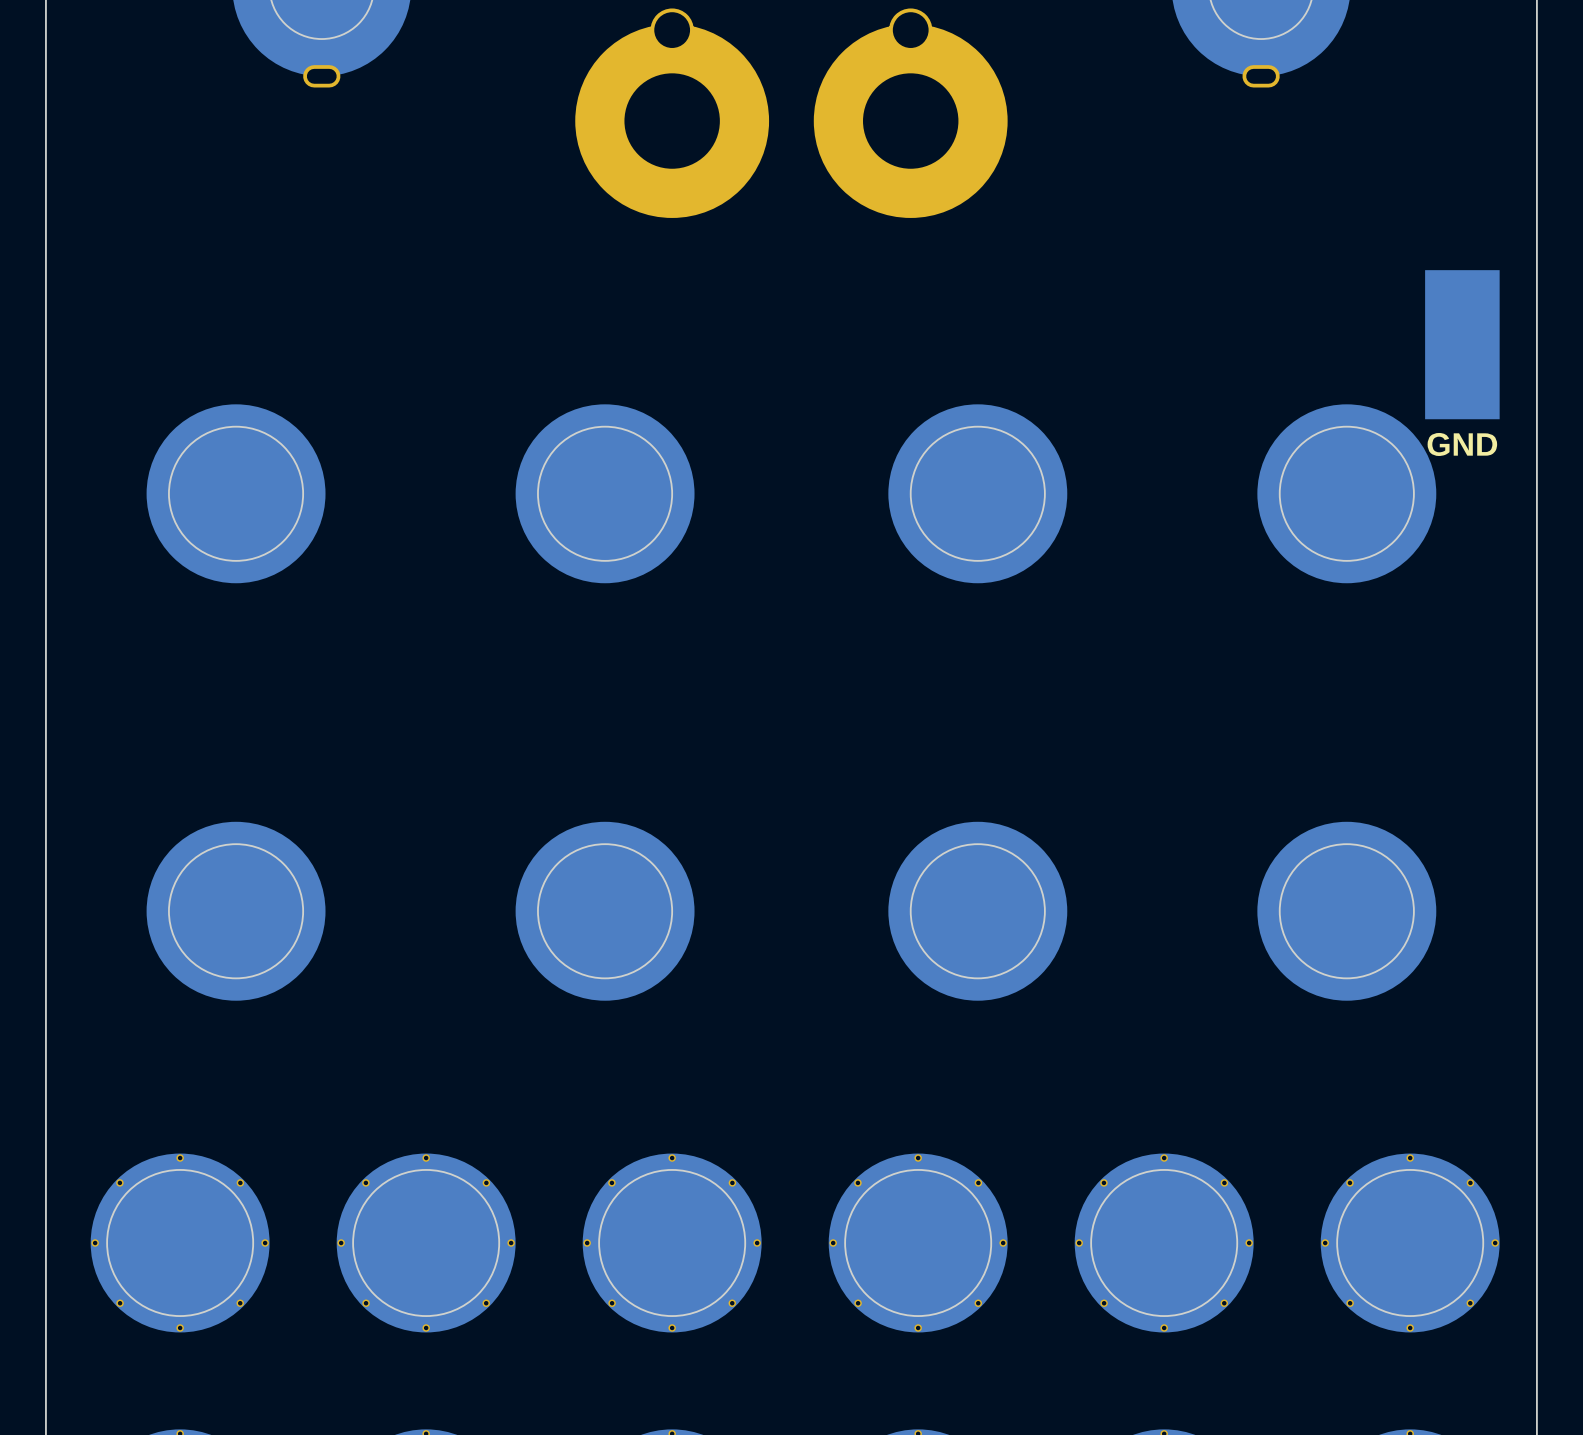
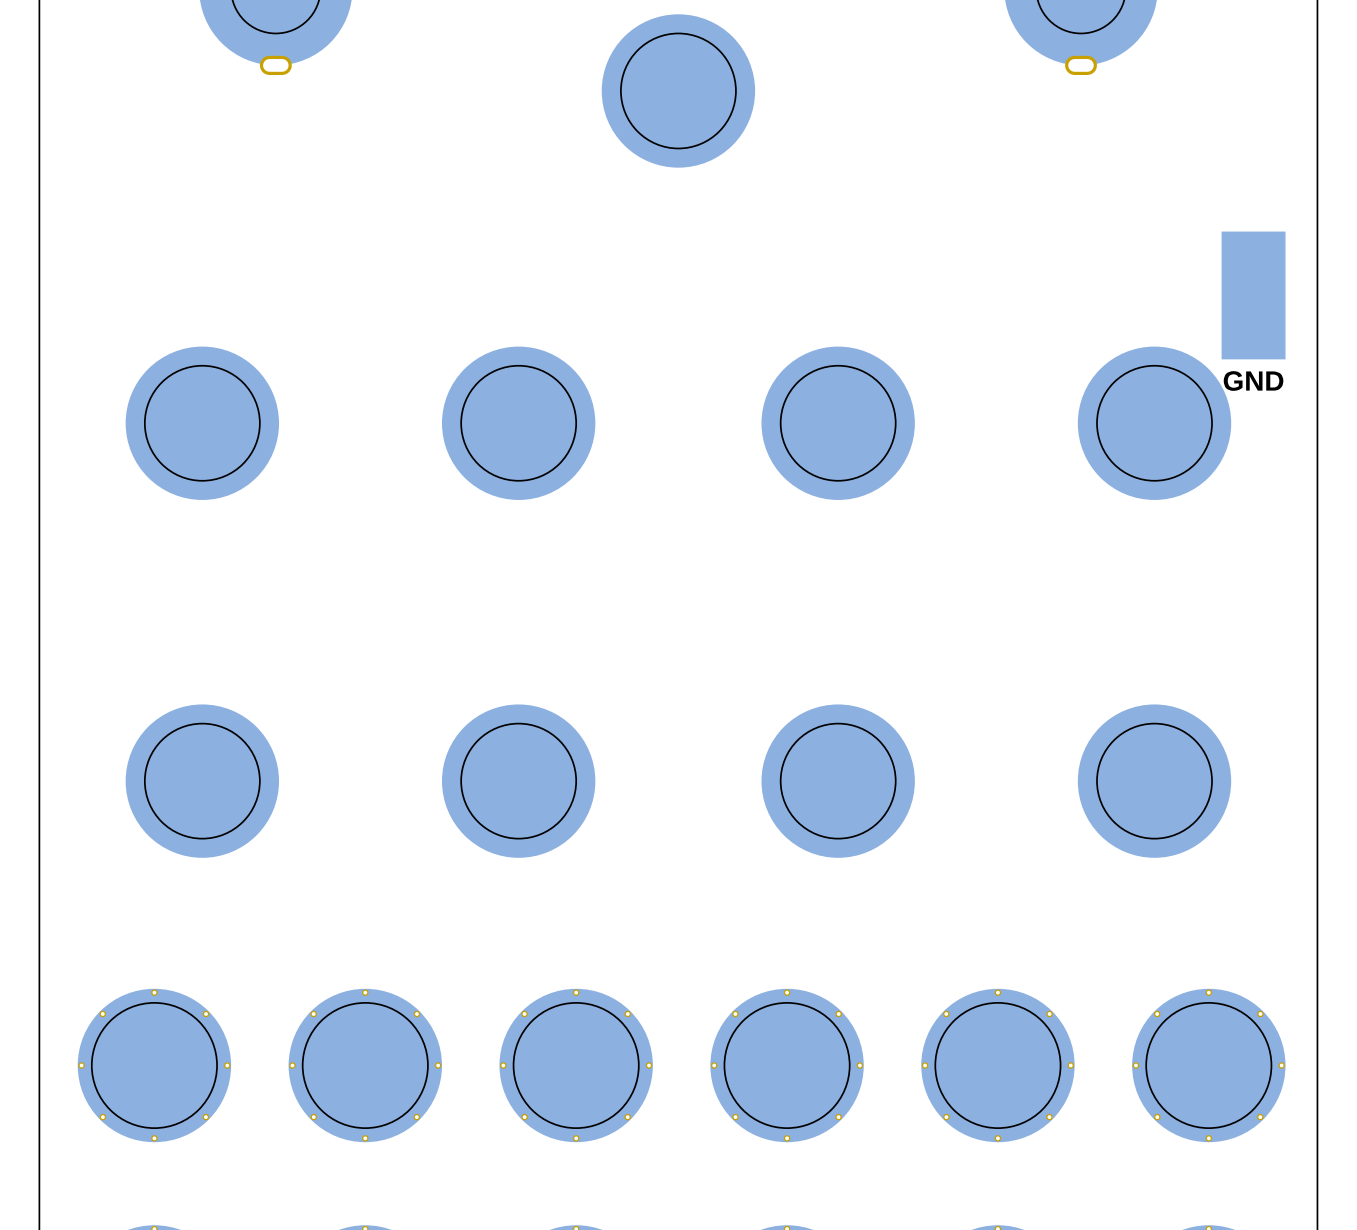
part: none -> (678, 90)
part: (672, 113) -> none
part: (910, 113) -> none

